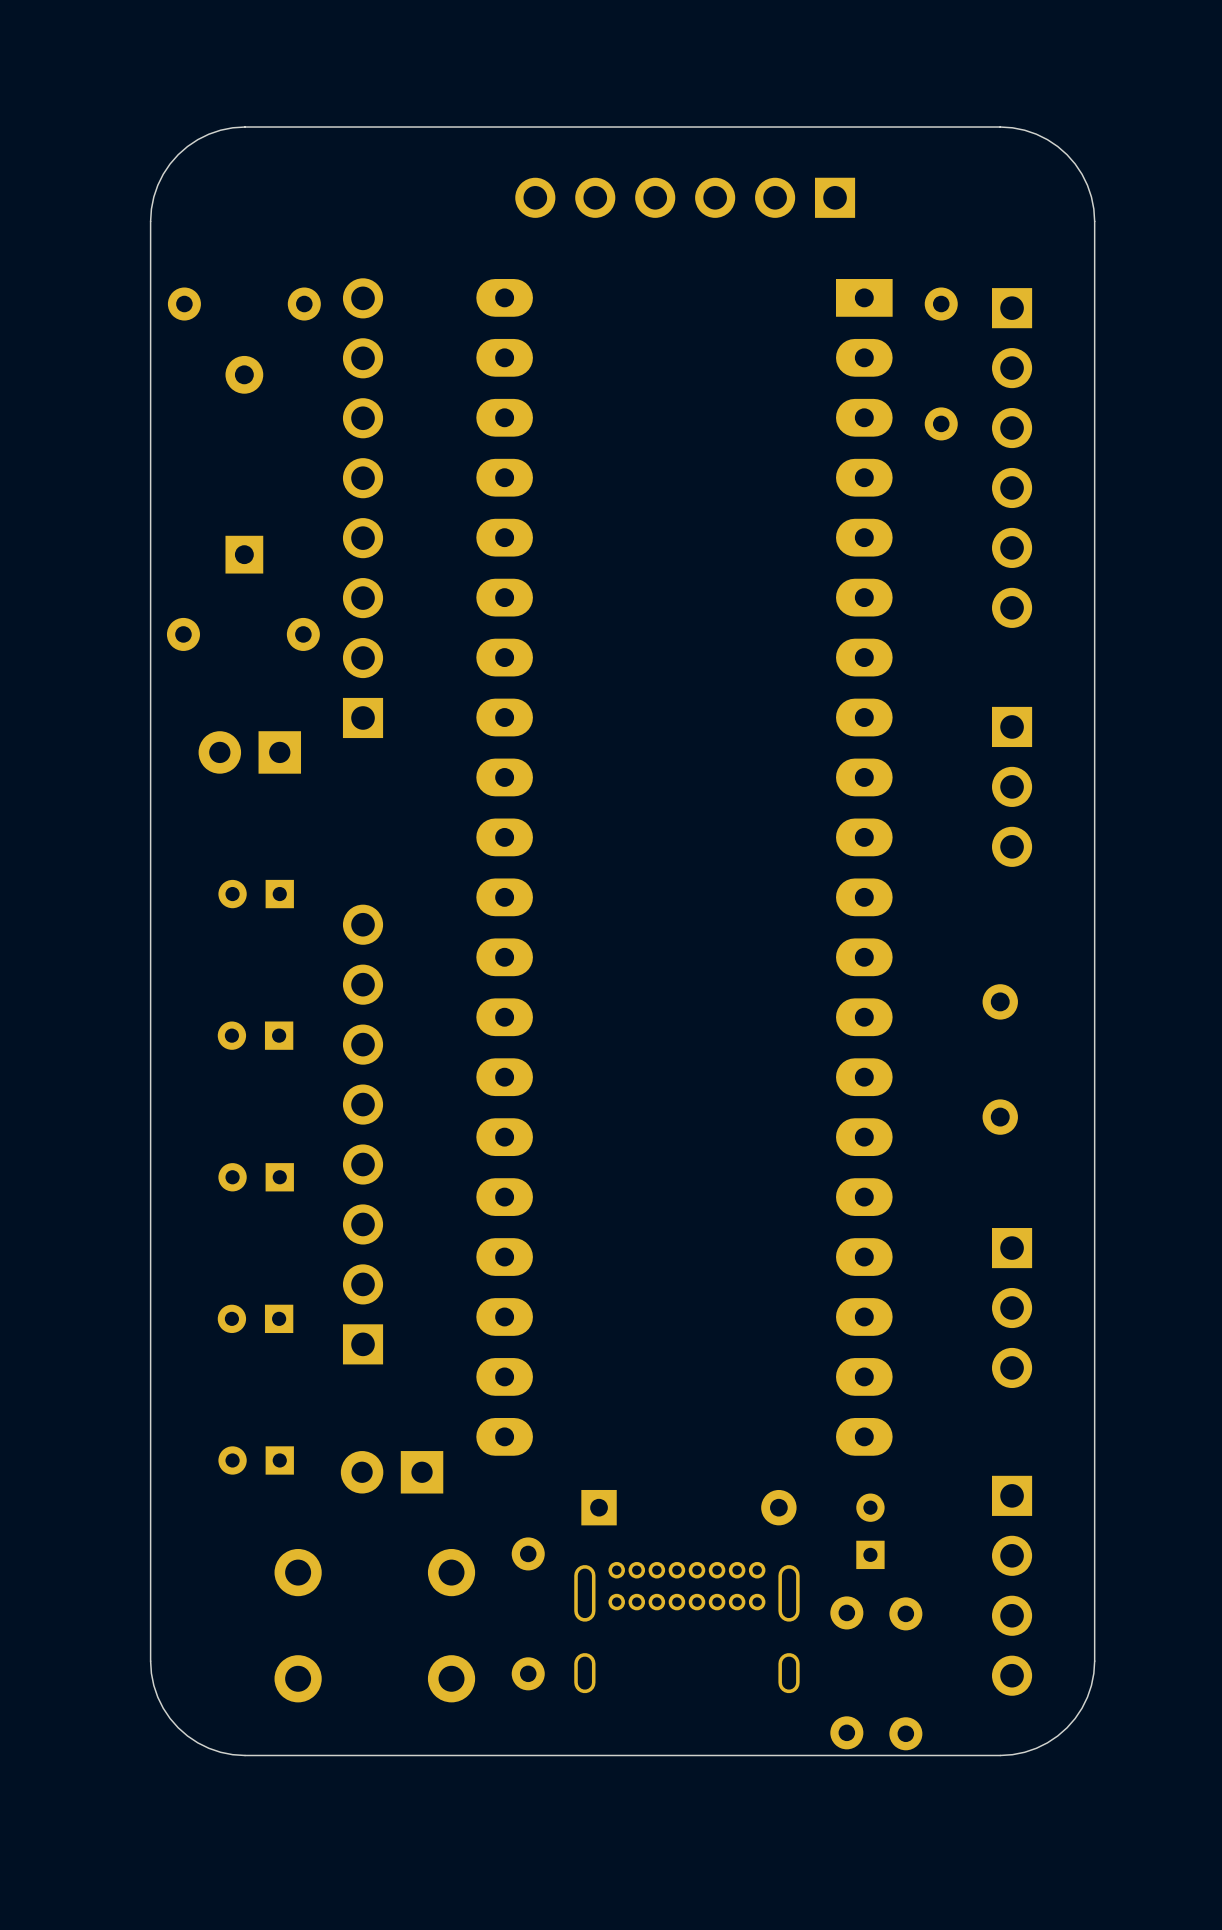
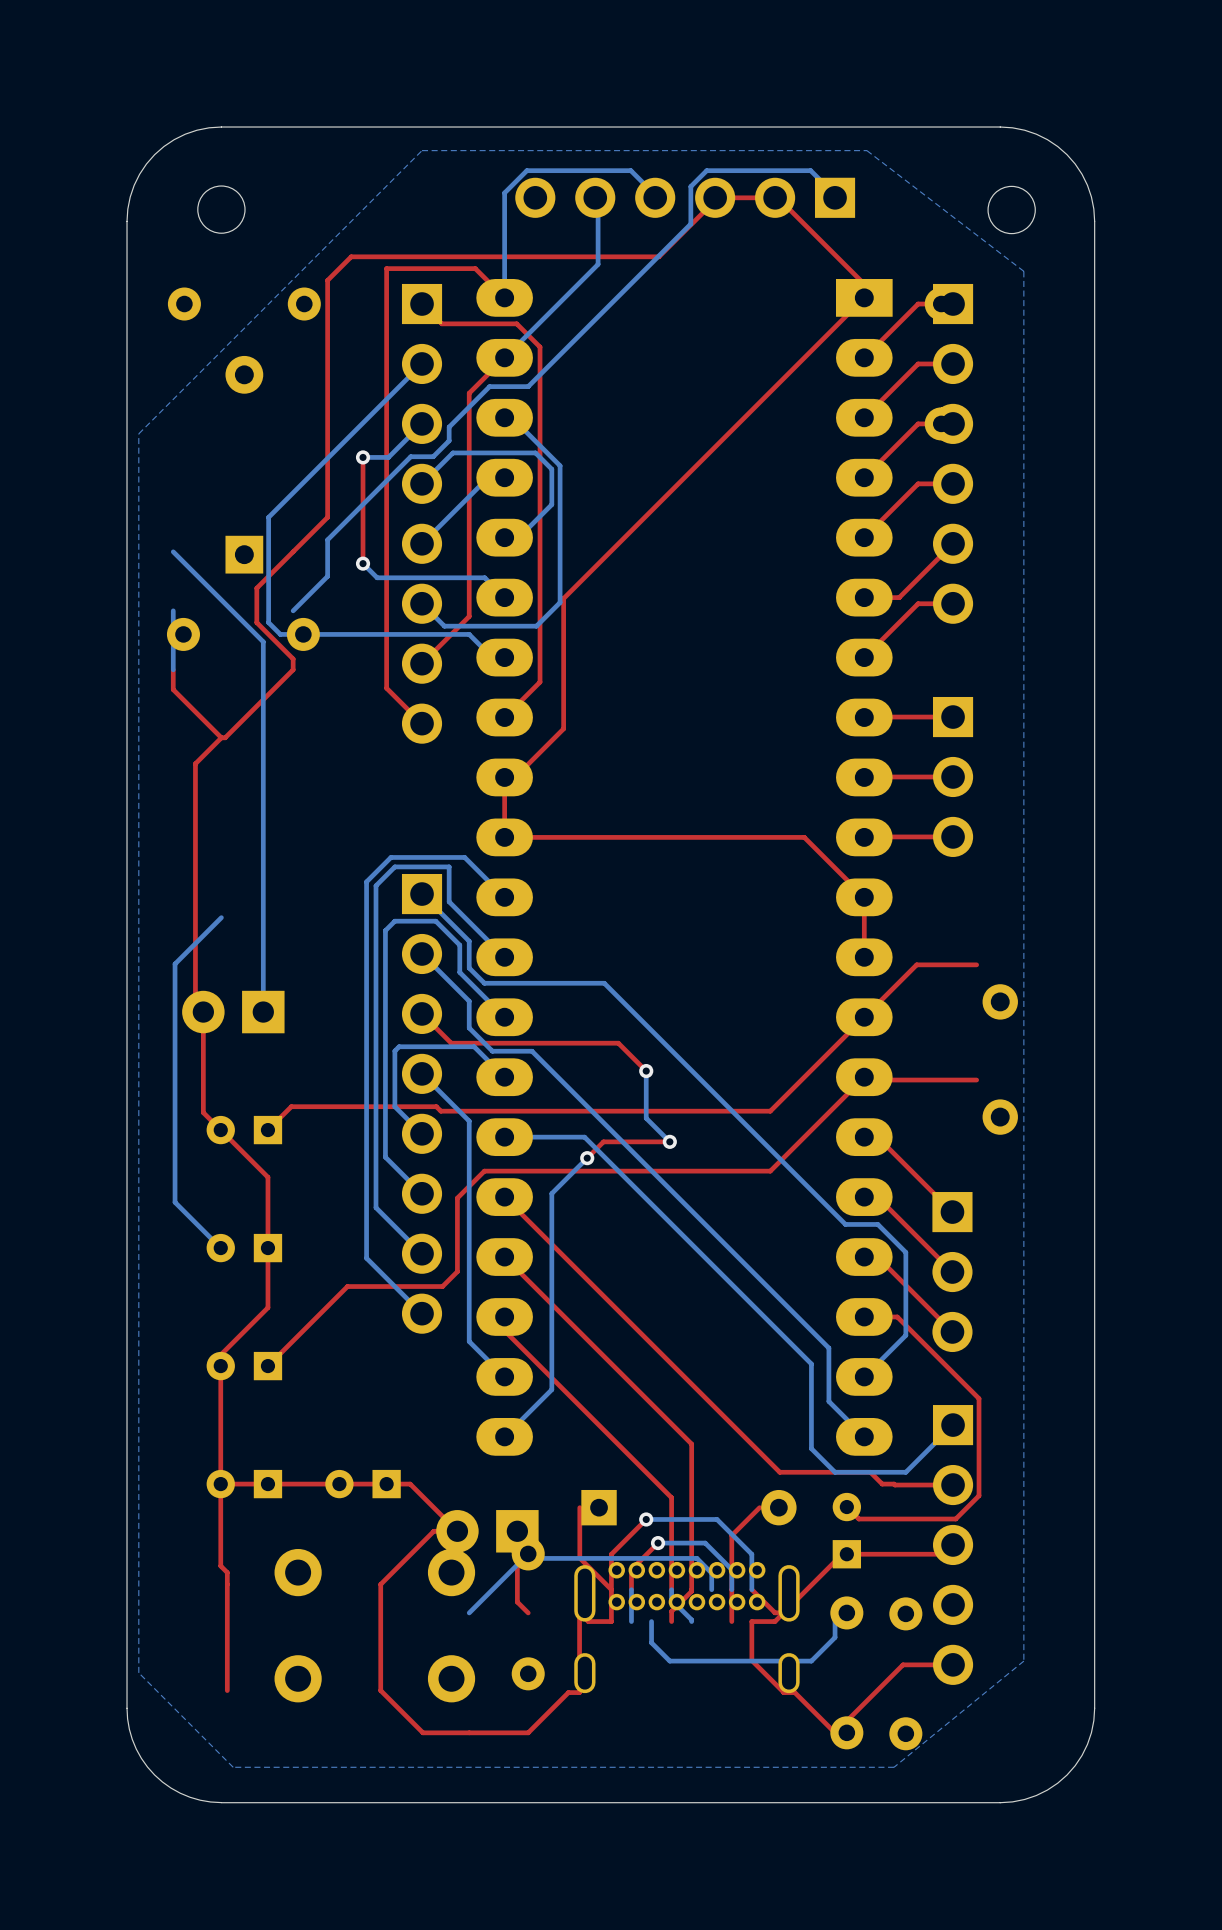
board edge: (245, 127) (232, 127) (208, 134) (187, 146) (178, 154) (170, 163) (157, 185) (151, 209) (150, 221) (150, 1661) (153, 1685) (163, 1708) (178, 1727) (197, 1742) (220, 1752) (245, 1755) (1000, 1755) (1024, 1752) (1036, 1748) (1047, 1742) (1067, 1727) (1075, 1718) (1087, 1697) (1093, 1673) (1094, 1661) -> (245, 127) (209, 127) (196, 130) (185, 134) (163, 146) (154, 154) (139, 174) (130, 196) (127, 221) (127, 1718) (136, 1749) (154, 1774) (180, 1793) (200, 1800) (221, 1802)
bottom zone outline: none -> (866, 150) (1023, 271) (1023, 1661) (894, 1767) (233, 1767) (138, 1672) (138, 433) (422, 150) (866, 150)
round board edge: none -> [197, 185, 246, 234]
round board edge: none -> [987, 185, 1036, 235]
bottom track: none -> (598, 197) (598, 264) (504, 357)
bottom track: none -> (658, 197) (630, 170) (526, 170) (504, 192) (504, 297)
bottom track: none -> (837, 197) (810, 170) (706, 170) (690, 186) (690, 224) (528, 386) (489, 386) (449, 427) (449, 440) (433, 456) (410, 456) (327, 539) (327, 576) (293, 610)
top track: none -> (504, 297) (475, 268) (386, 268) (386, 688) (422, 723)
top track: none -> (422, 304) (441, 323) (516, 323) (540, 347) (540, 682) (504, 717)
top track: none -> (953, 304) (918, 304) (864, 357)
top track: none -> (504, 357) (469, 393) (469, 616) (422, 663)
bottom track: none -> (422, 363) (268, 517) (268, 622) (280, 634) (469, 634) (492, 657) (504, 657)
top track: none -> (953, 363) (918, 363) (864, 417)
bottom track: none -> (504, 417) (512, 417) (560, 465) (560, 602) (536, 626) (444, 626) (422, 603)
bottom track: none -> (422, 423) (388, 457) (363, 457)
top track: none -> (953, 423) (918, 423) (864, 477)
top track: none -> (363, 457) (363, 563)
via: none -> (363, 457)
part position: (1012, 458) -> (953, 453)
bottom track: none -> (504, 477) (488, 477) (422, 543)
bottom track: none -> (422, 483) (452, 452) (535, 452) (551, 469) (551, 504) (518, 537) (504, 537)
top track: none -> (953, 483) (918, 483) (864, 537)
part rotation: 0° (363, 508) -> 180° (422, 513)
top track: none -> (953, 543) (899, 597) (864, 597)
bottom track: none -> (173, 551) (263, 641) (263, 1012)
bottom track: none -> (363, 563) (377, 577) (484, 577) (504, 597)
via: none -> (363, 563)
top track: none -> (953, 603) (918, 603) (864, 657)
bottom track: none -> (173, 610) (173, 669)
top track: none -> (173, 669) (173, 689) (221, 737)
top track: none -> (953, 717) (864, 717)
top track: none -> (221, 737) (195, 763) (195, 997) (203, 1005) (203, 1112) (267, 1177) (267, 1307) (220, 1354) (220, 1566) (227, 1572) (227, 1690)
top track: none -> (221, 737) (225, 737) (293, 669) (293, 658) (256, 622) (256, 588) (327, 517) (327, 280) (351, 256) (658, 256) (717, 197) (777, 197) (864, 284) (864, 297) (563, 598) (563, 728) (515, 777) (504, 777) (504, 837) (804, 837) (864, 897) (864, 957)
part: (249, 752) -> none
top track: none -> (953, 776) (864, 777)
part position: (1012, 786) -> (953, 776)
top track: none -> (953, 836) (864, 837)
part: (256, 894) -> none
bottom track: none -> (422, 894) (469, 941) (469, 968) (484, 983) (604, 983) (845, 1224) (877, 1224) (905, 1252) (905, 1335) (864, 1376)
bottom track: none -> (504, 897) (464, 857) (390, 857) (366, 881) (366, 1258) (422, 1313)
bottom track: none -> (221, 917) (175, 964) (175, 1202) (220, 1248)
bottom track: none -> (422, 953) (469, 1001) (469, 1028) (492, 1051) (532, 1051) (828, 1348) (828, 1401) (864, 1436)
bottom track: none -> (504, 957) (449, 901) (449, 866) (394, 866) (376, 885) (376, 1207) (422, 1253)
top track: none -> (976, 964) (916, 964) (770, 1111) (440, 1111) (436, 1106) (291, 1106) (267, 1130)
part: none -> (233, 1012)
top track: none -> (422, 1013) (451, 1043) (618, 1043) (646, 1071)
bottom track: none -> (504, 1017) (459, 972) (459, 945) (435, 921) (394, 921) (385, 930) (385, 1157) (422, 1193)
part: (255, 1035) -> none
bottom track: none -> (646, 1071) (646, 1118) (669, 1141)
via: none -> (646, 1071)
bottom track: none -> (422, 1073) (469, 1121) (469, 1341) (504, 1376)
bottom track: none -> (504, 1077) (474, 1046) (399, 1046) (394, 1050) (394, 1106) (422, 1133)
top track: none -> (976, 1080) (867, 1080) (864, 1077) (770, 1171) (484, 1171) (457, 1198) (457, 1271) (442, 1286) (347, 1286) (267, 1366)
part: none -> (244, 1130)
part rotation: 0° (363, 1134) -> 180° (422, 1103)
bottom track: none -> (504, 1137) (584, 1137) (811, 1364) (811, 1448) (835, 1472) (905, 1472) (953, 1425)
top track: none -> (864, 1137) (877, 1137) (952, 1212)
top track: none -> (669, 1141) (603, 1141) (587, 1158)
via: none -> (669, 1141)
bottom track: none -> (587, 1158) (551, 1193) (551, 1389) (504, 1436)
via: none -> (587, 1158)
part: (256, 1177) -> none
top track: none -> (504, 1197) (779, 1472) (870, 1472) (882, 1484) (953, 1485)
top track: none -> (864, 1197) (877, 1197) (952, 1272)
part: none -> (244, 1248)
top track: none -> (504, 1257) (691, 1444) (691, 1591) (671, 1611) (671, 1621)
top track: none -> (864, 1257) (877, 1257) (952, 1331)
part position: (1012, 1308) -> (952, 1272)
top track: none -> (504, 1316) (504, 1330) (671, 1497) (671, 1589)
top track: none -> (864, 1316) (897, 1316) (979, 1398) (979, 1495) (955, 1519) (858, 1519) (846, 1507)
part: (255, 1318) -> none
part: none -> (244, 1366)
part position: (256, 1460) -> (244, 1484)
part position: (392, 1472) -> (487, 1531)
top track: none -> (220, 1484) (410, 1484) (457, 1531) (433, 1531) (380, 1584) (380, 1690) (422, 1732) (528, 1732) (568, 1692) (579, 1692) (579, 1612) (588, 1621) (611, 1621) (611, 1554) (646, 1519)
part: none -> (363, 1484)
top track: none -> (579, 1507) (579, 1558) (611, 1589)
top track: none -> (759, 1507) (731, 1535) (731, 1621)
bottom track: none -> (646, 1519) (717, 1519) (751, 1554) (751, 1589)
via: none -> (646, 1519)
top track: none -> (517, 1531) (517, 1602) (528, 1612)
part position: (870, 1531) -> (846, 1530)
top track: none -> (658, 1543) (631, 1569) (631, 1589)
bottom track: none -> (658, 1543) (705, 1543) (731, 1569) (731, 1589)
via: none -> (658, 1543)
top track: none -> (953, 1544) (943, 1554) (842, 1554) (774, 1621) (751, 1621) (751, 1660) (783, 1692) (794, 1692) (835, 1732) (903, 1664) (953, 1664)
part: none -> (953, 1544)
part: (1012, 1585) -> none
bottom track: none -> (631, 1589) (631, 1621)
bottom track: none -> (671, 1589) (671, 1599) (691, 1621)
bottom track: none -> (711, 1589) (711, 1573) (696, 1558) (523, 1558) (469, 1612)
top track: none -> (751, 1589) (774, 1612) (783, 1612)
bottom track: none -> (835, 1612) (835, 1637) (811, 1661) (669, 1661) (651, 1642) (651, 1621)
board edge: none -> (1094, 1661) (1093, 1720) (1087, 1744) (1082, 1755) (1067, 1775) (1047, 1790) (1024, 1799) (1012, 1801) (221, 1802)

